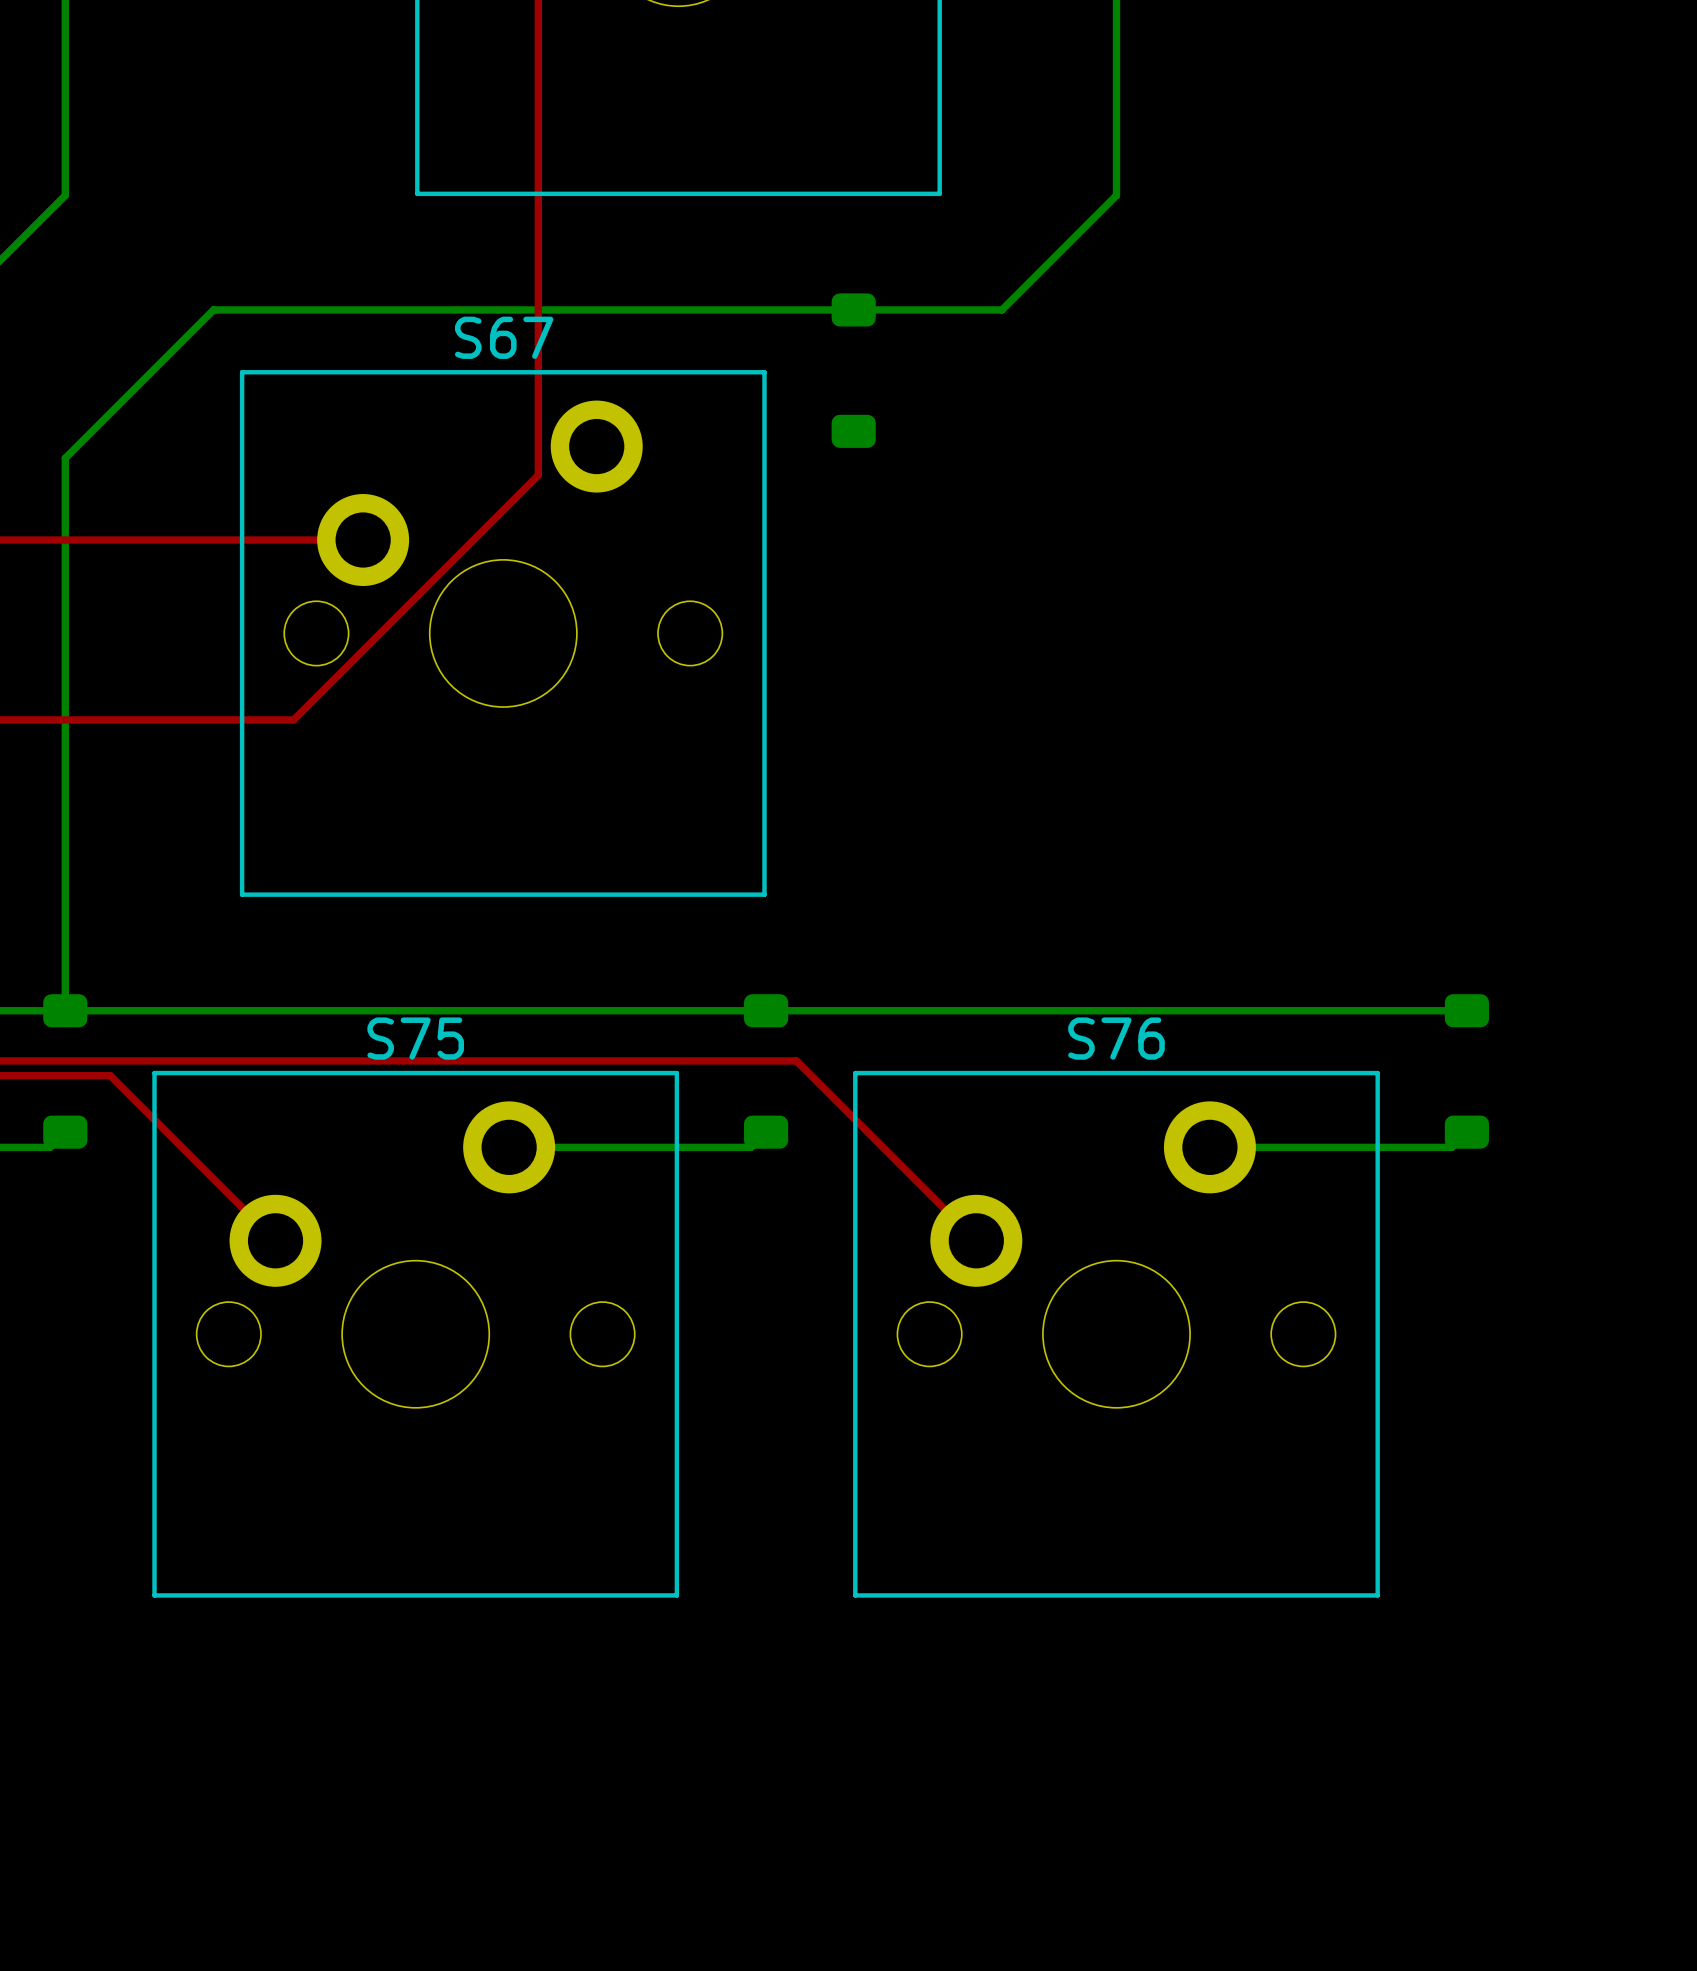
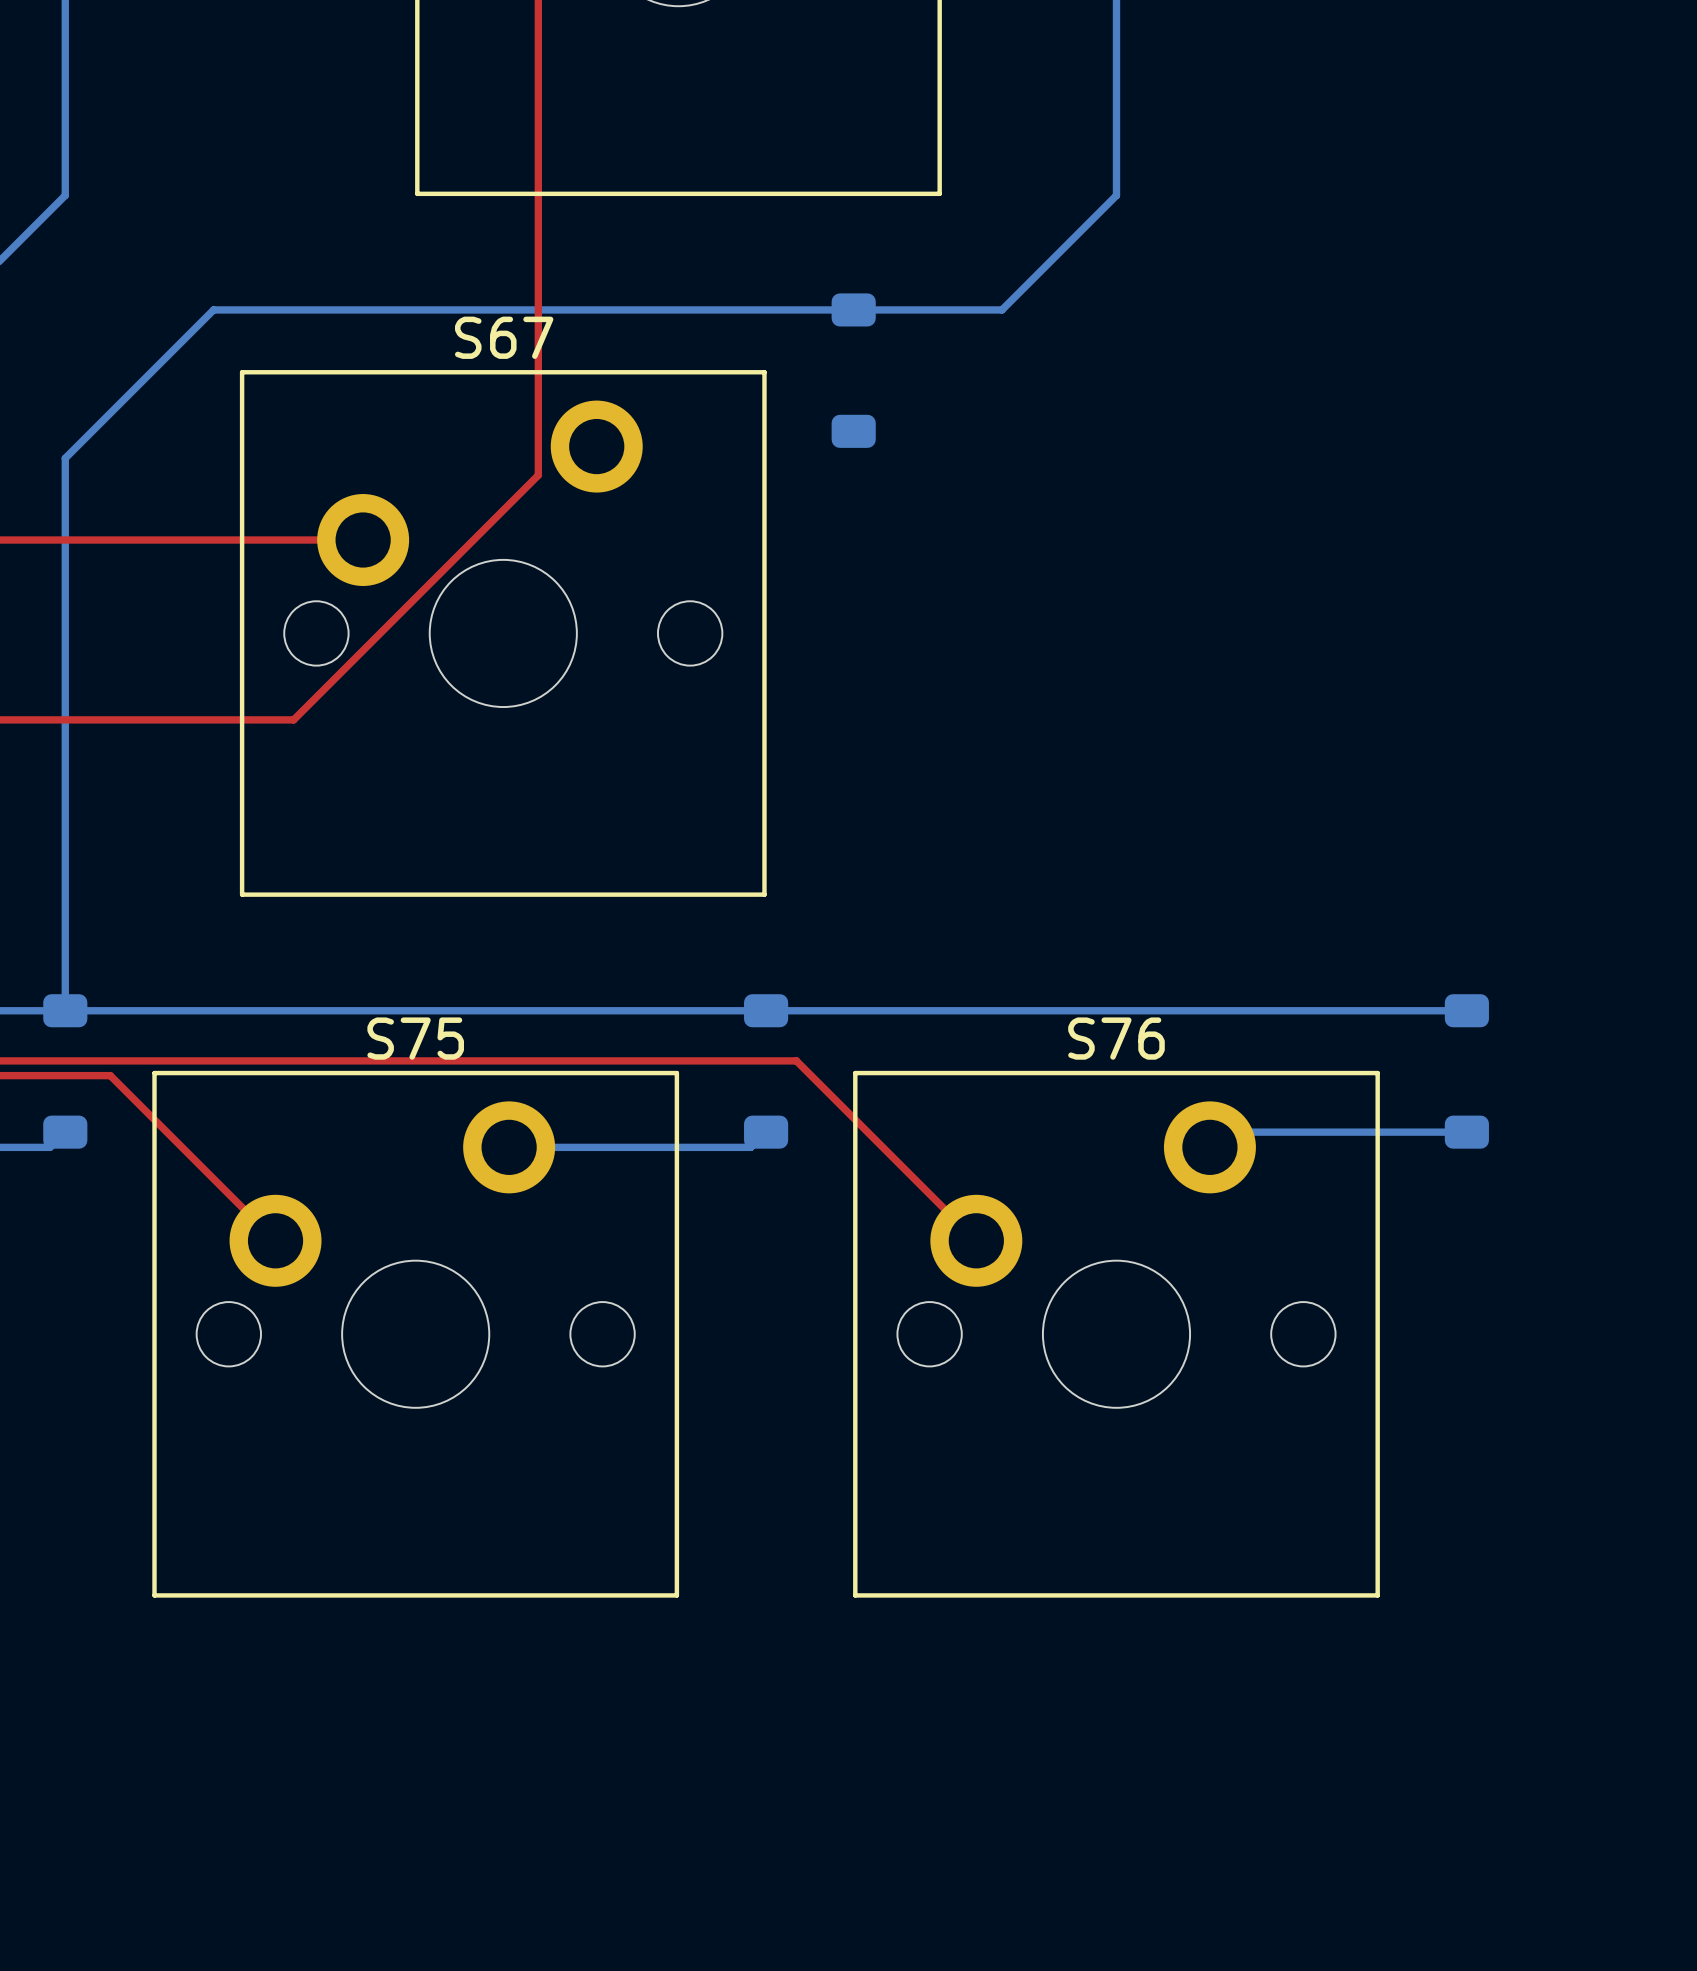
bottom track: (1466, 1132) (1451, 1147) (1209, 1147) -> (1466, 1132) (1225, 1132) (1209, 1147)

